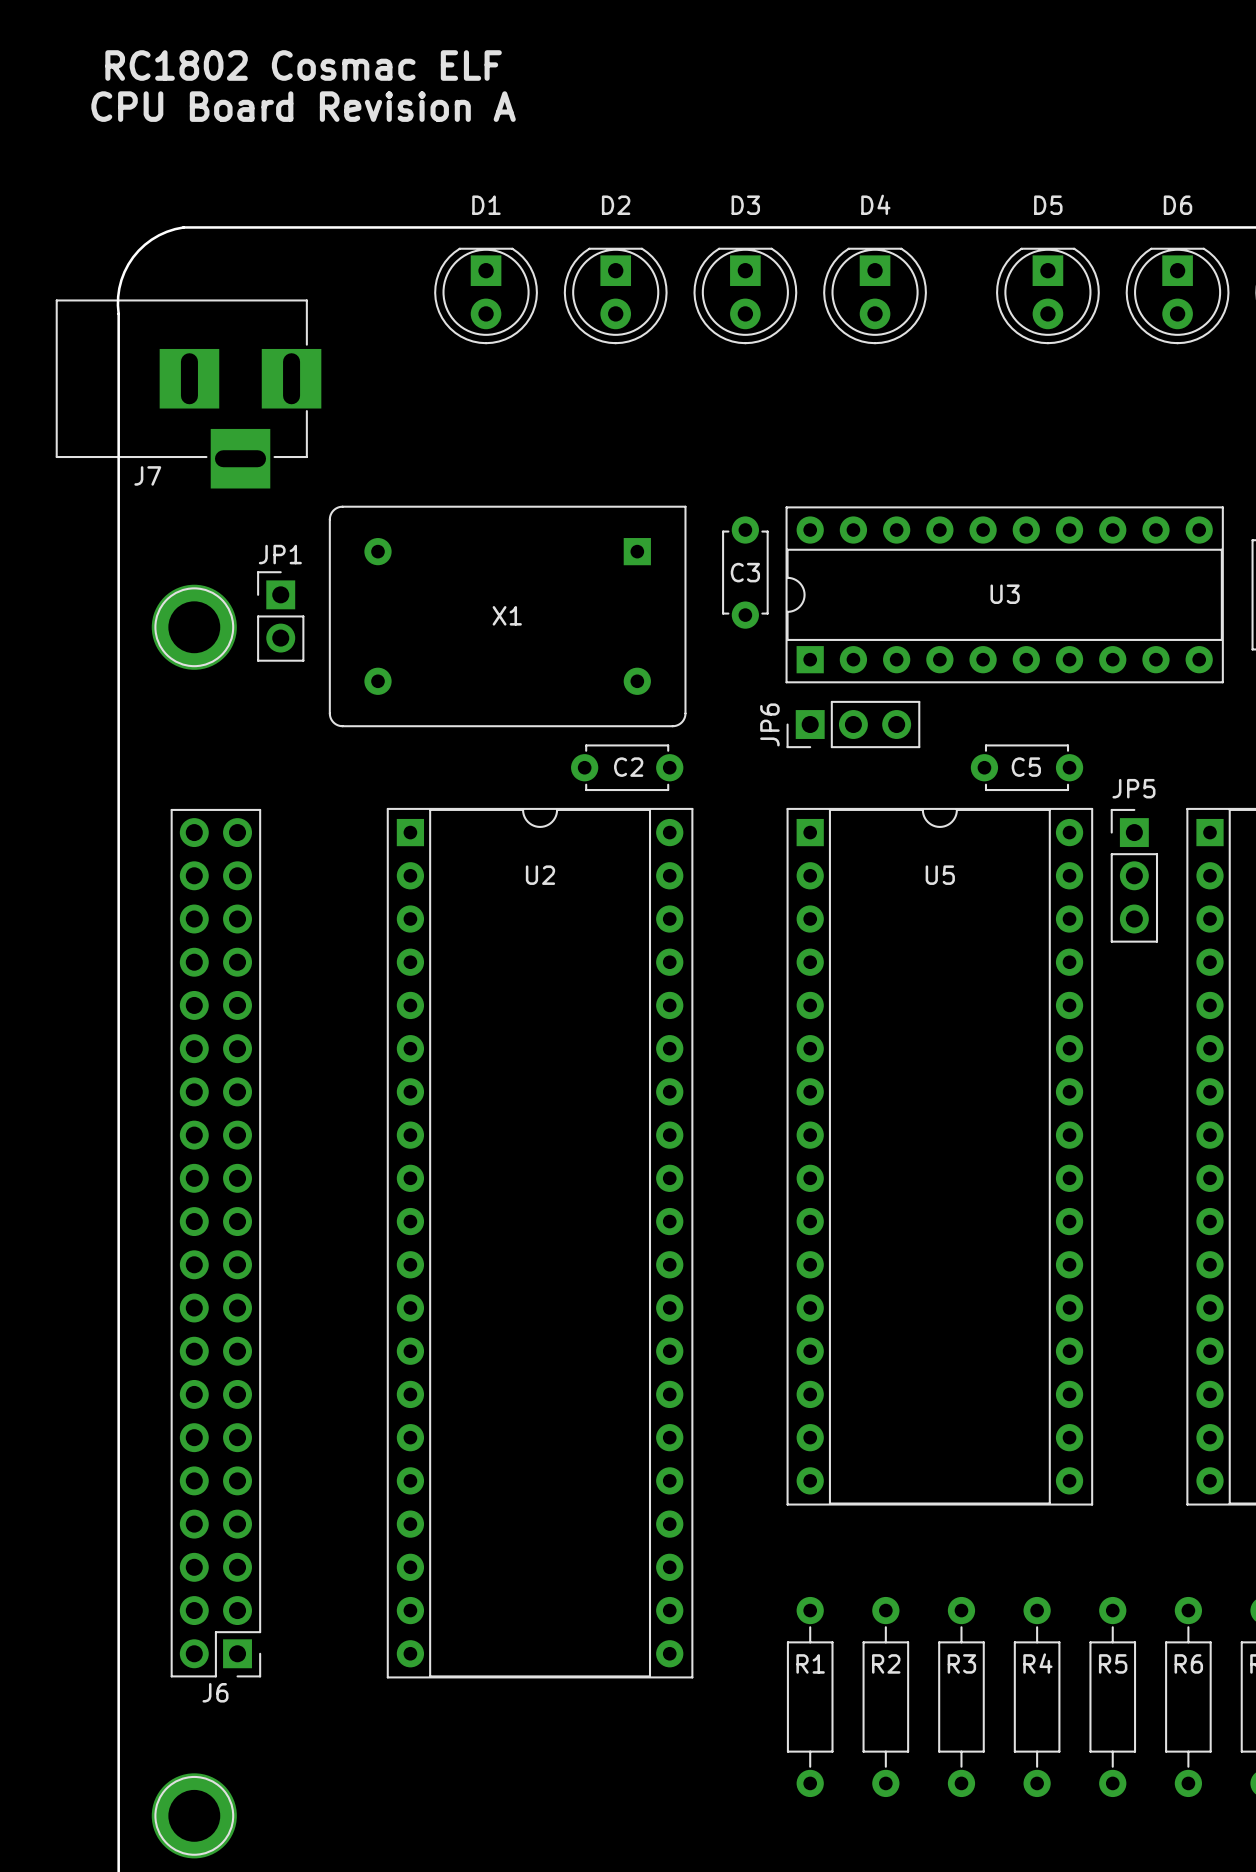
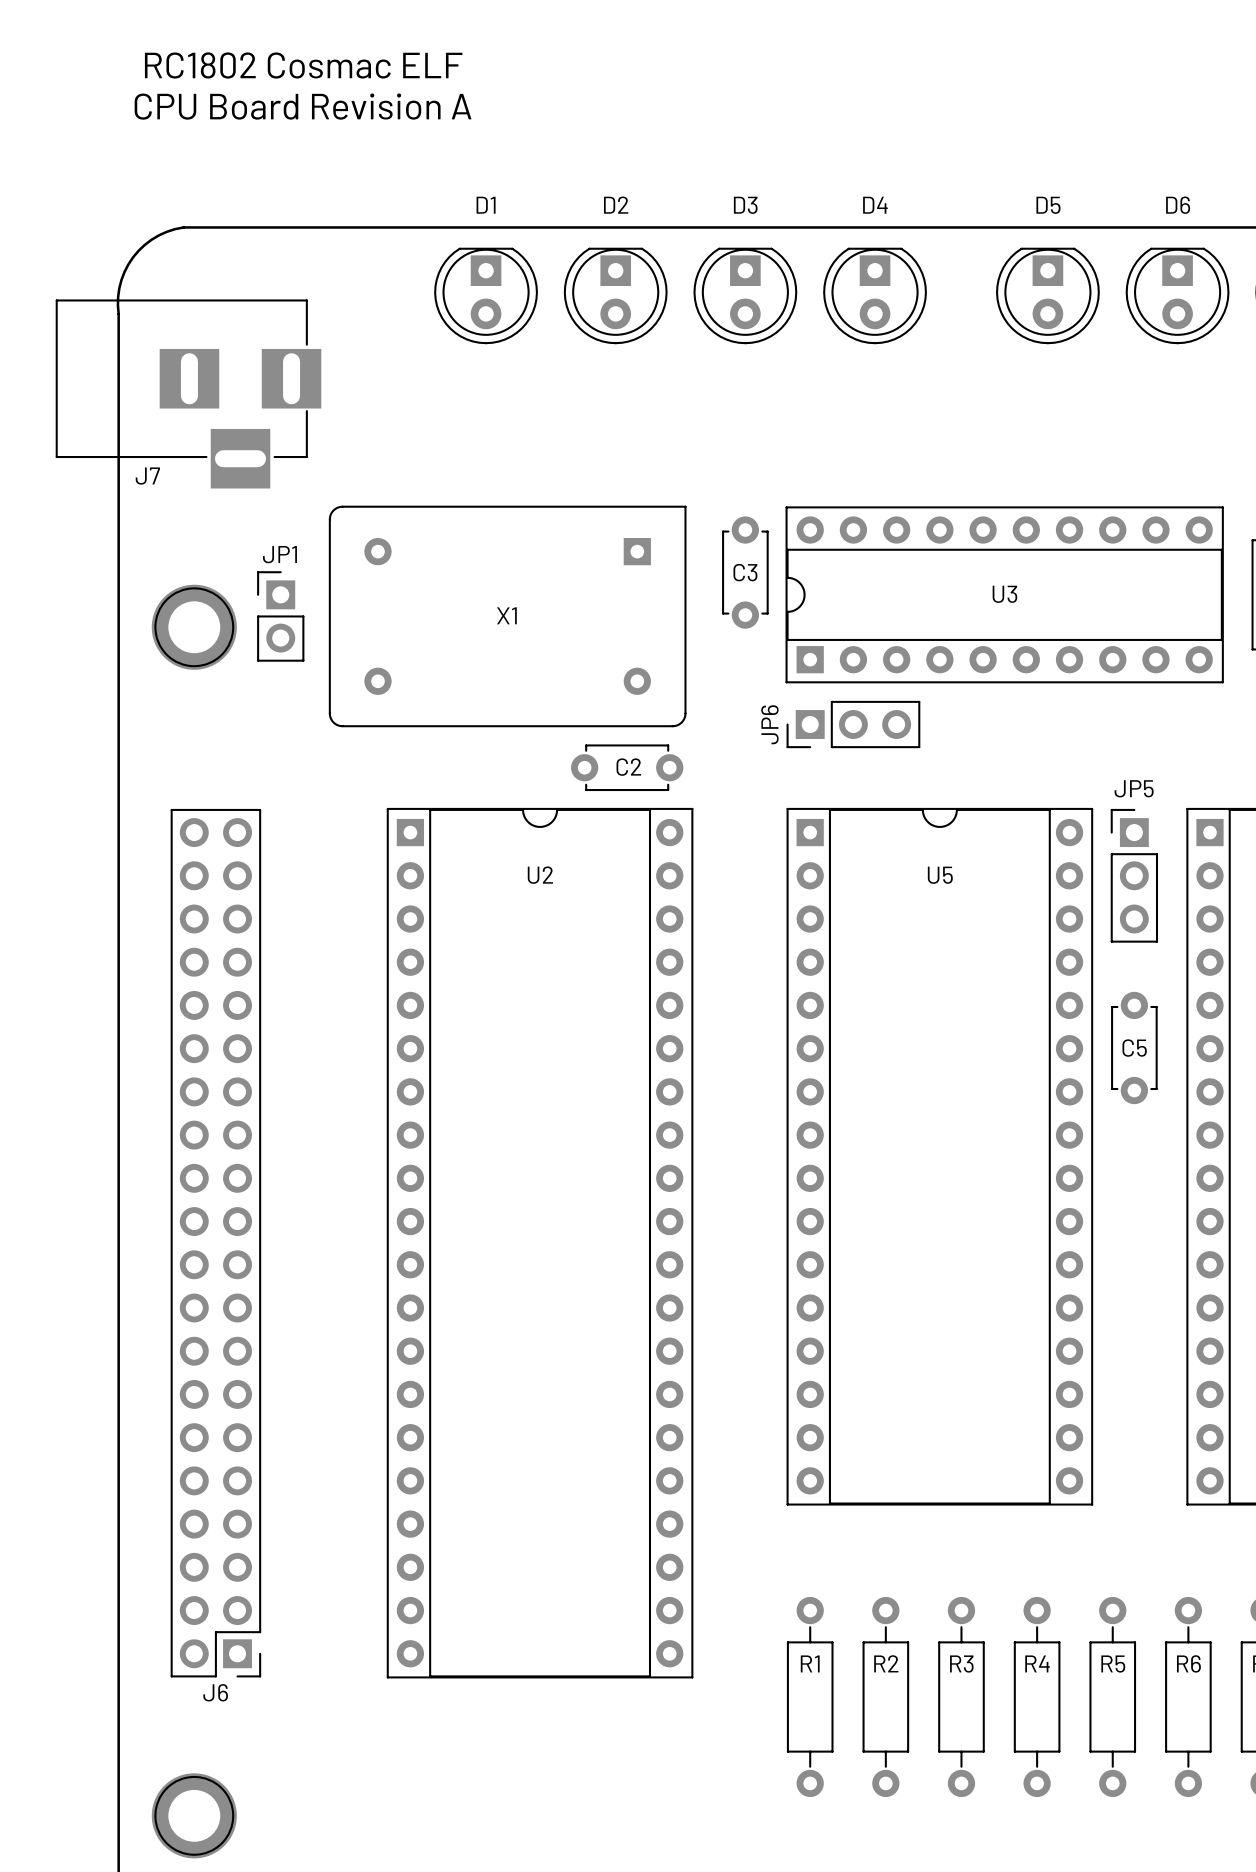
C5 rotation: 0° (1026, 767) -> 90° clockwise (1134, 1047)
C5 position: (1026, 767) -> (1134, 1047)

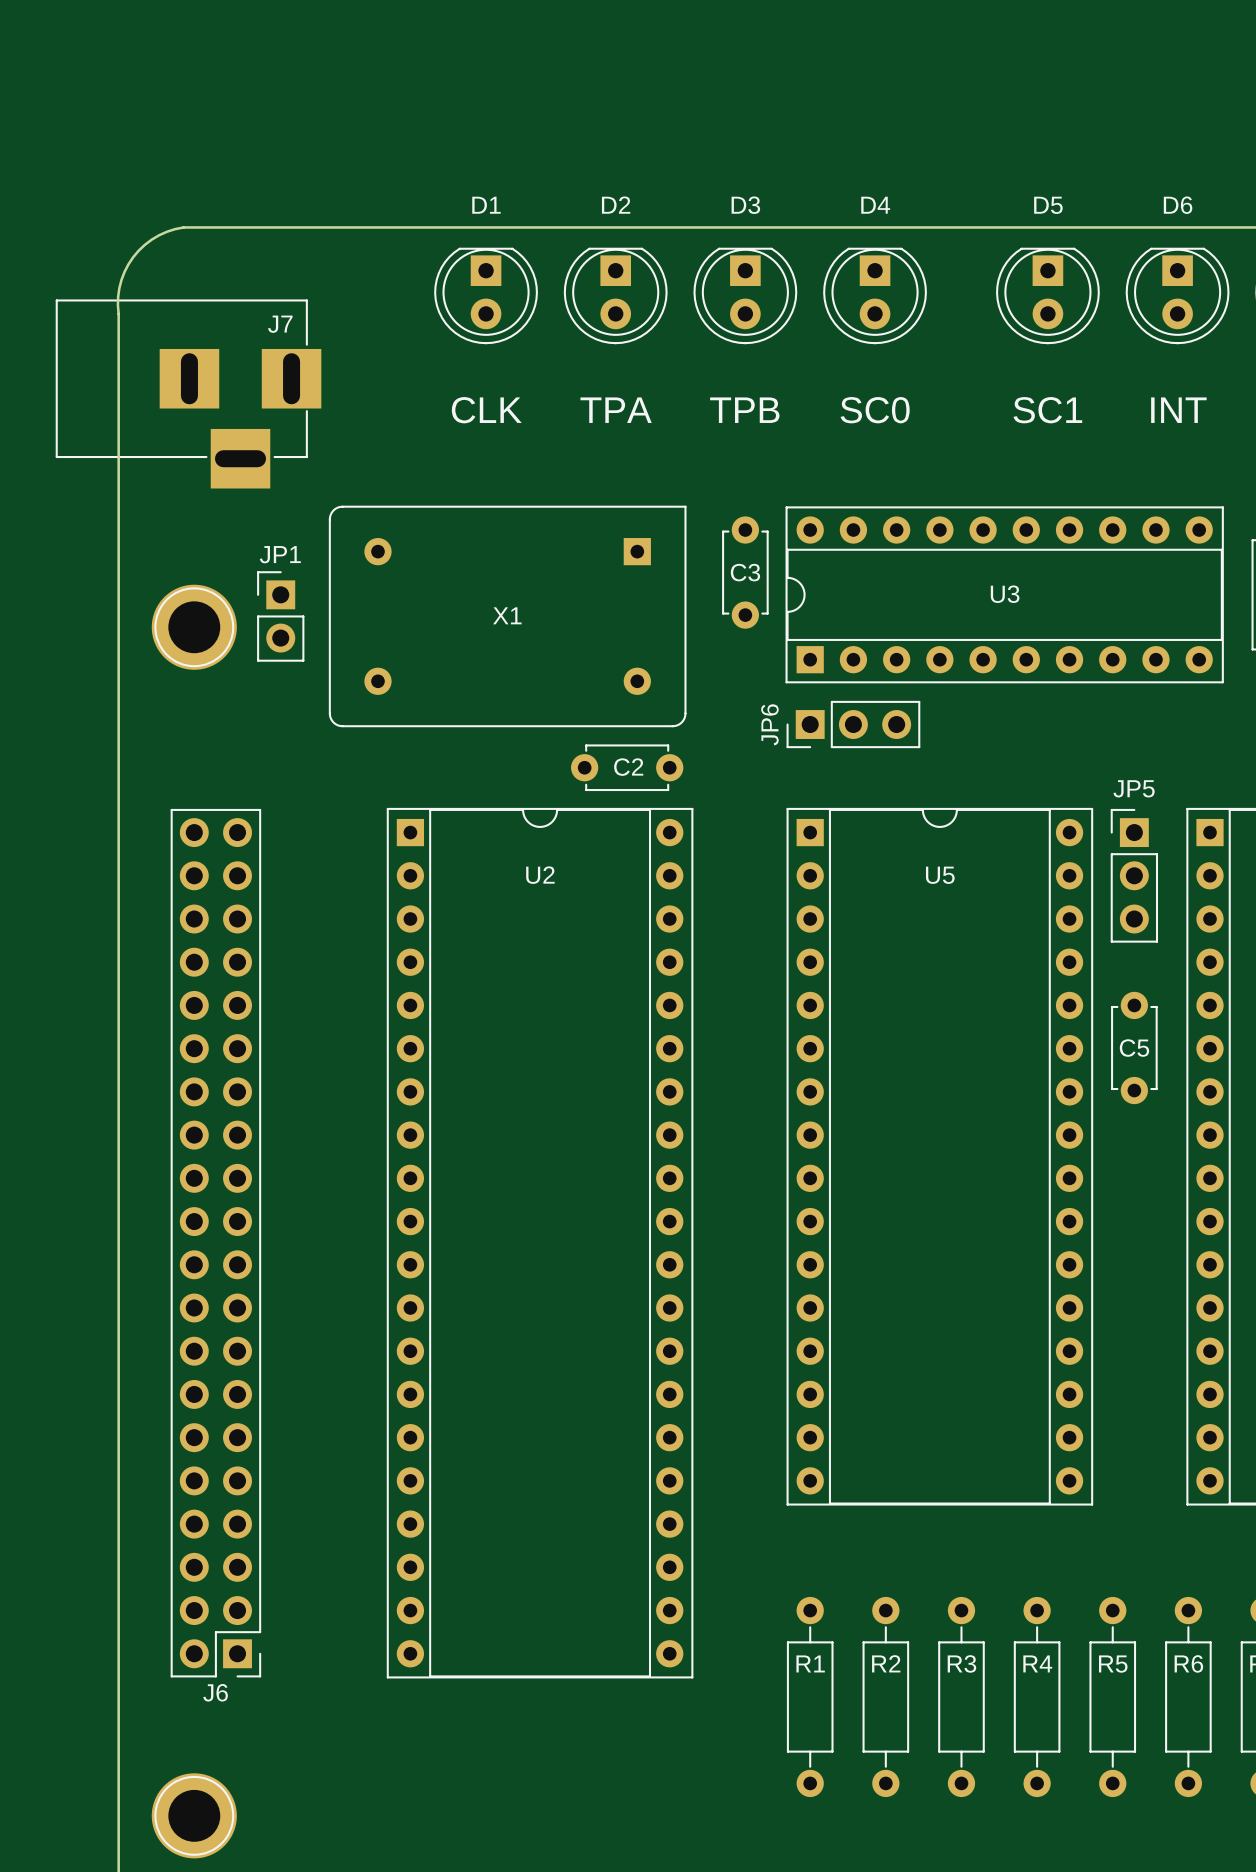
text: RC1802 Cosmac ELF (303, 65) -> none
text: CPU Board Revision A (303, 106) -> none
text: none -> CLK (486, 410)
text: none -> TPA (616, 410)
text: none -> TPB (744, 410)
text: none -> SC0 (875, 410)
text: none -> SC1 (1047, 410)
text: none -> INT (1178, 410)
J7 name position: J7 (147, 476) -> J7 (280, 324)

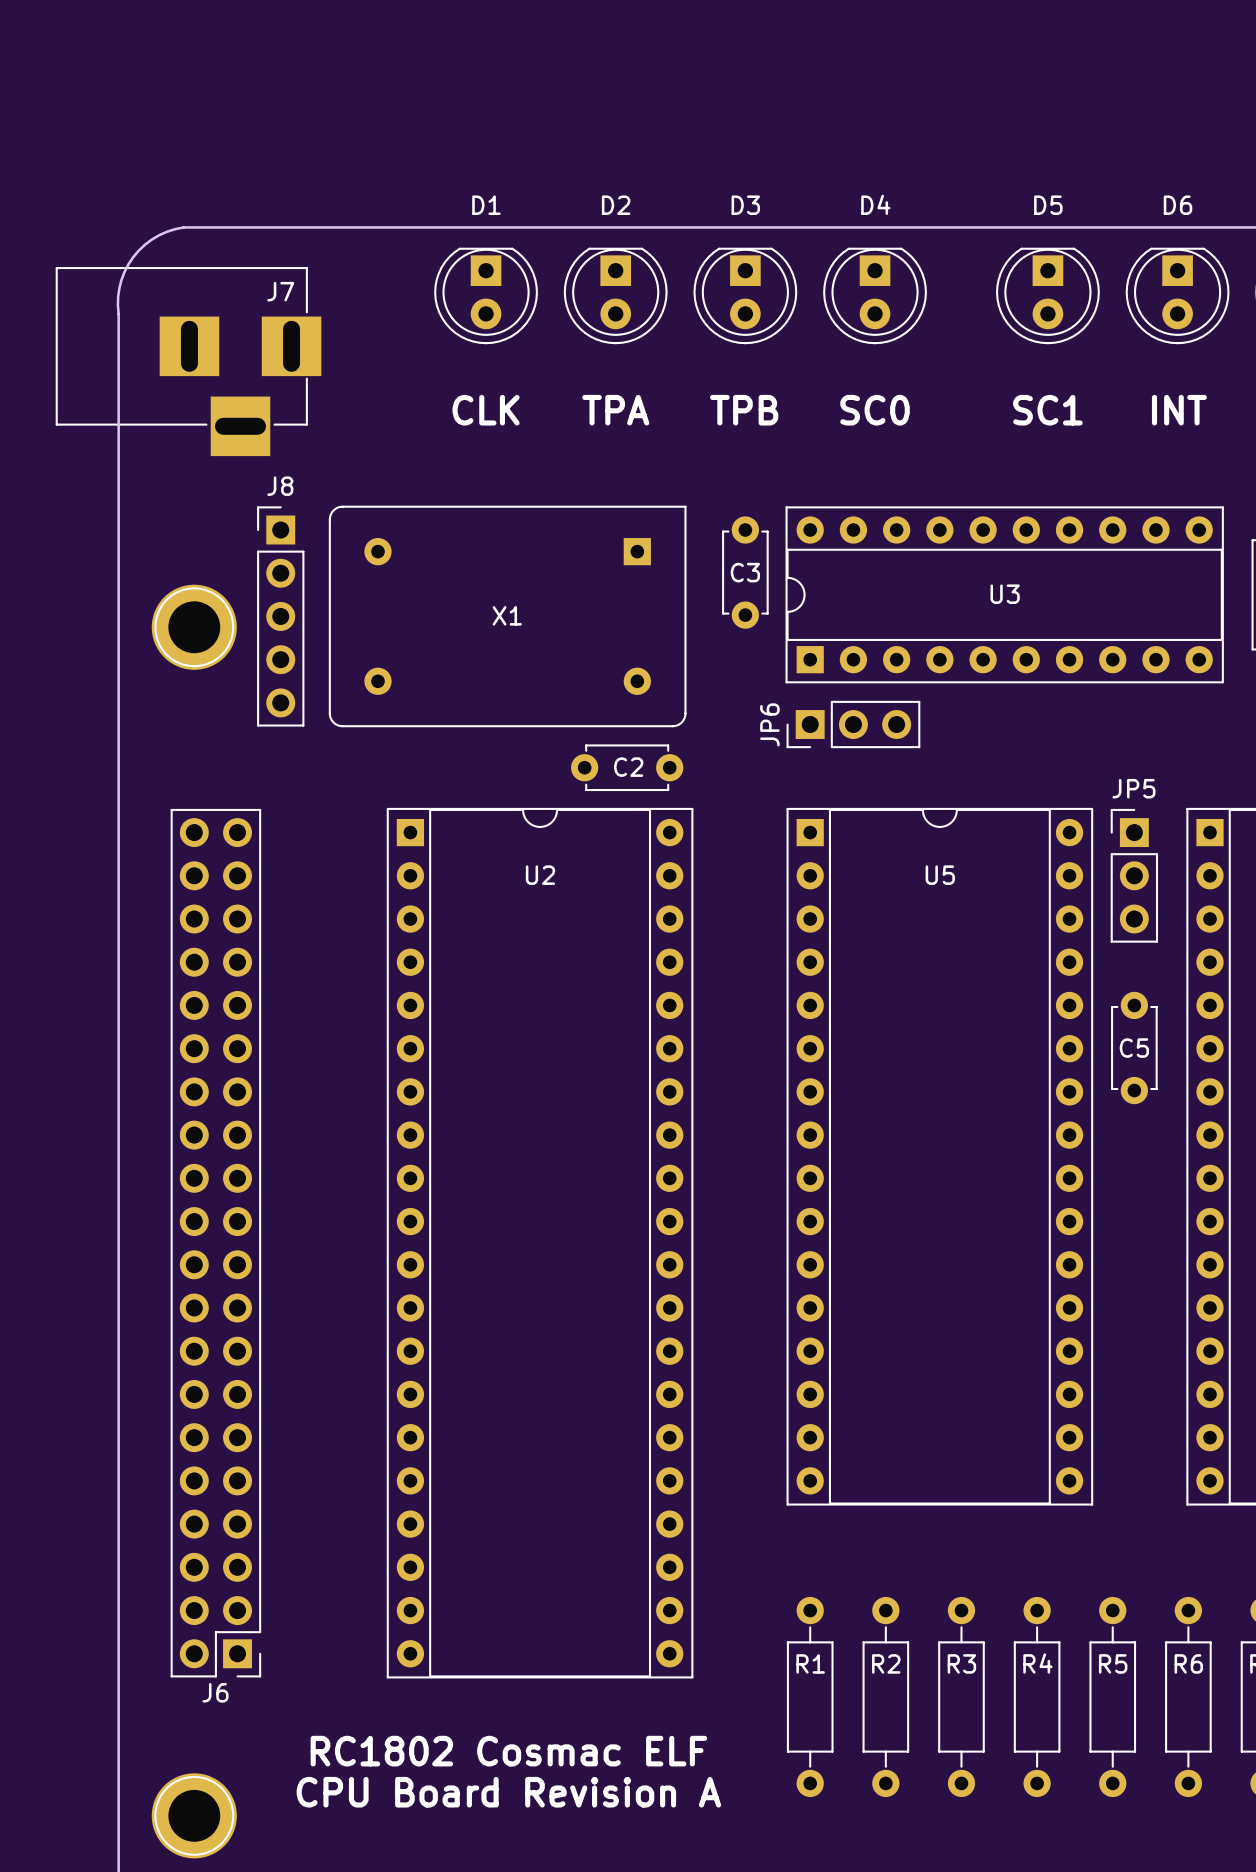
J7 position: (188, 393) -> (188, 361)
JP1: (280, 616) -> none
J8: none -> (280, 616)
text: none -> RC1802 Cosmac ELF (508, 1751)
text: none -> CPU Board Revision A (508, 1792)

